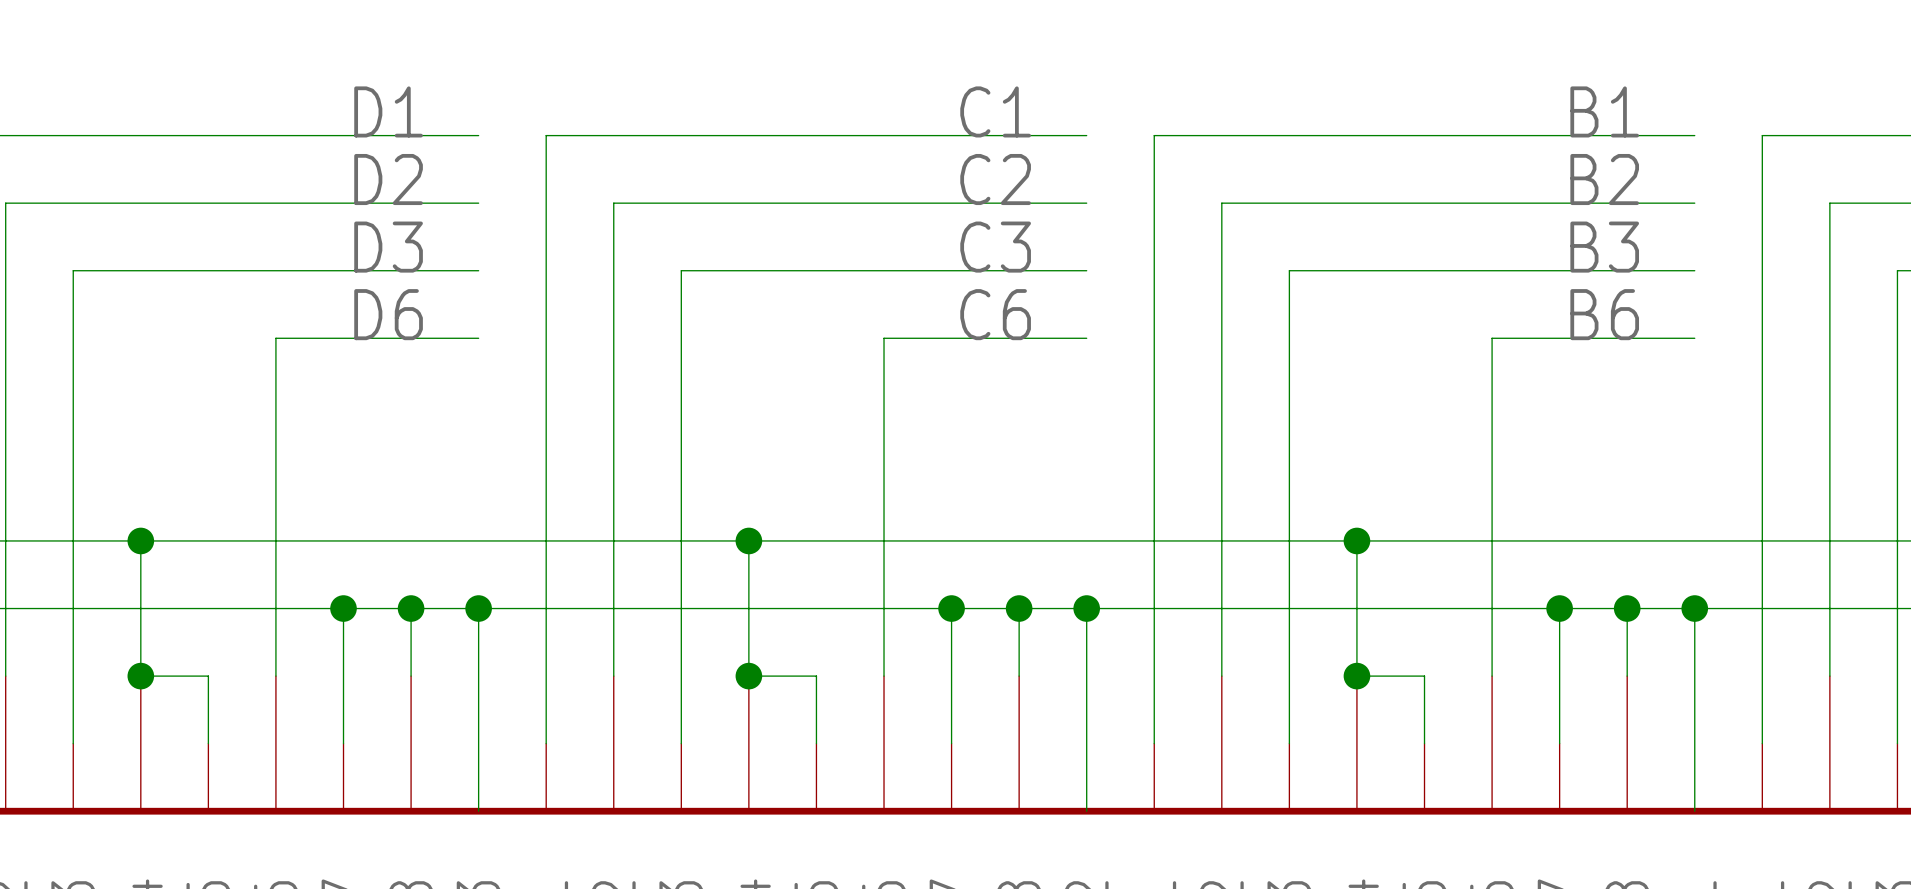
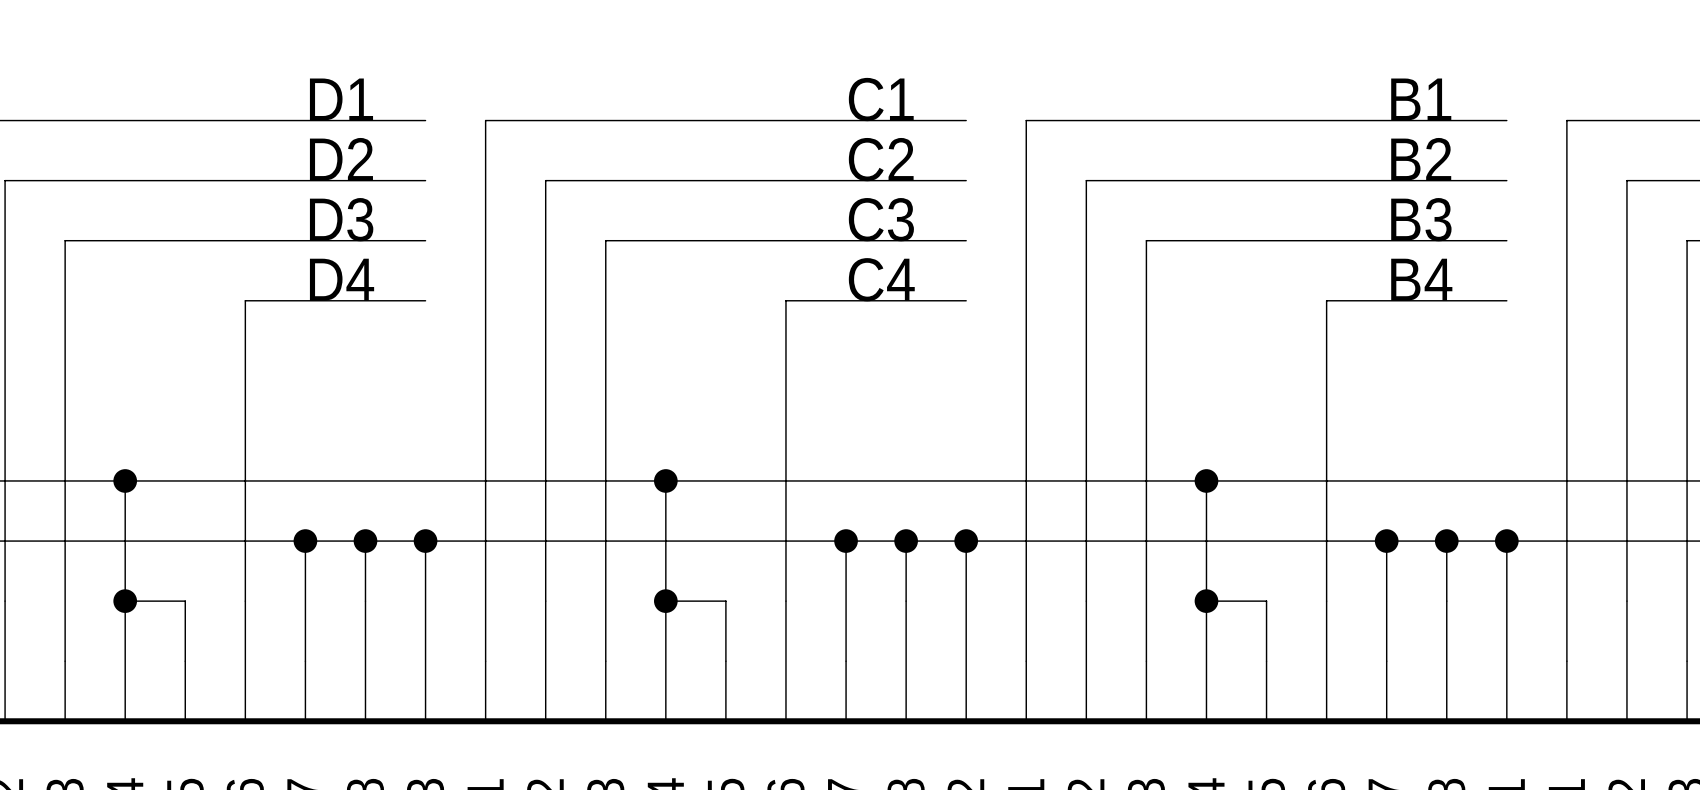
label: D6 (388, 314) -> D4 (342, 279)
label: C6 (995, 314) -> C4 (881, 279)
label: B6 (1604, 314) -> B4 (1421, 279)

